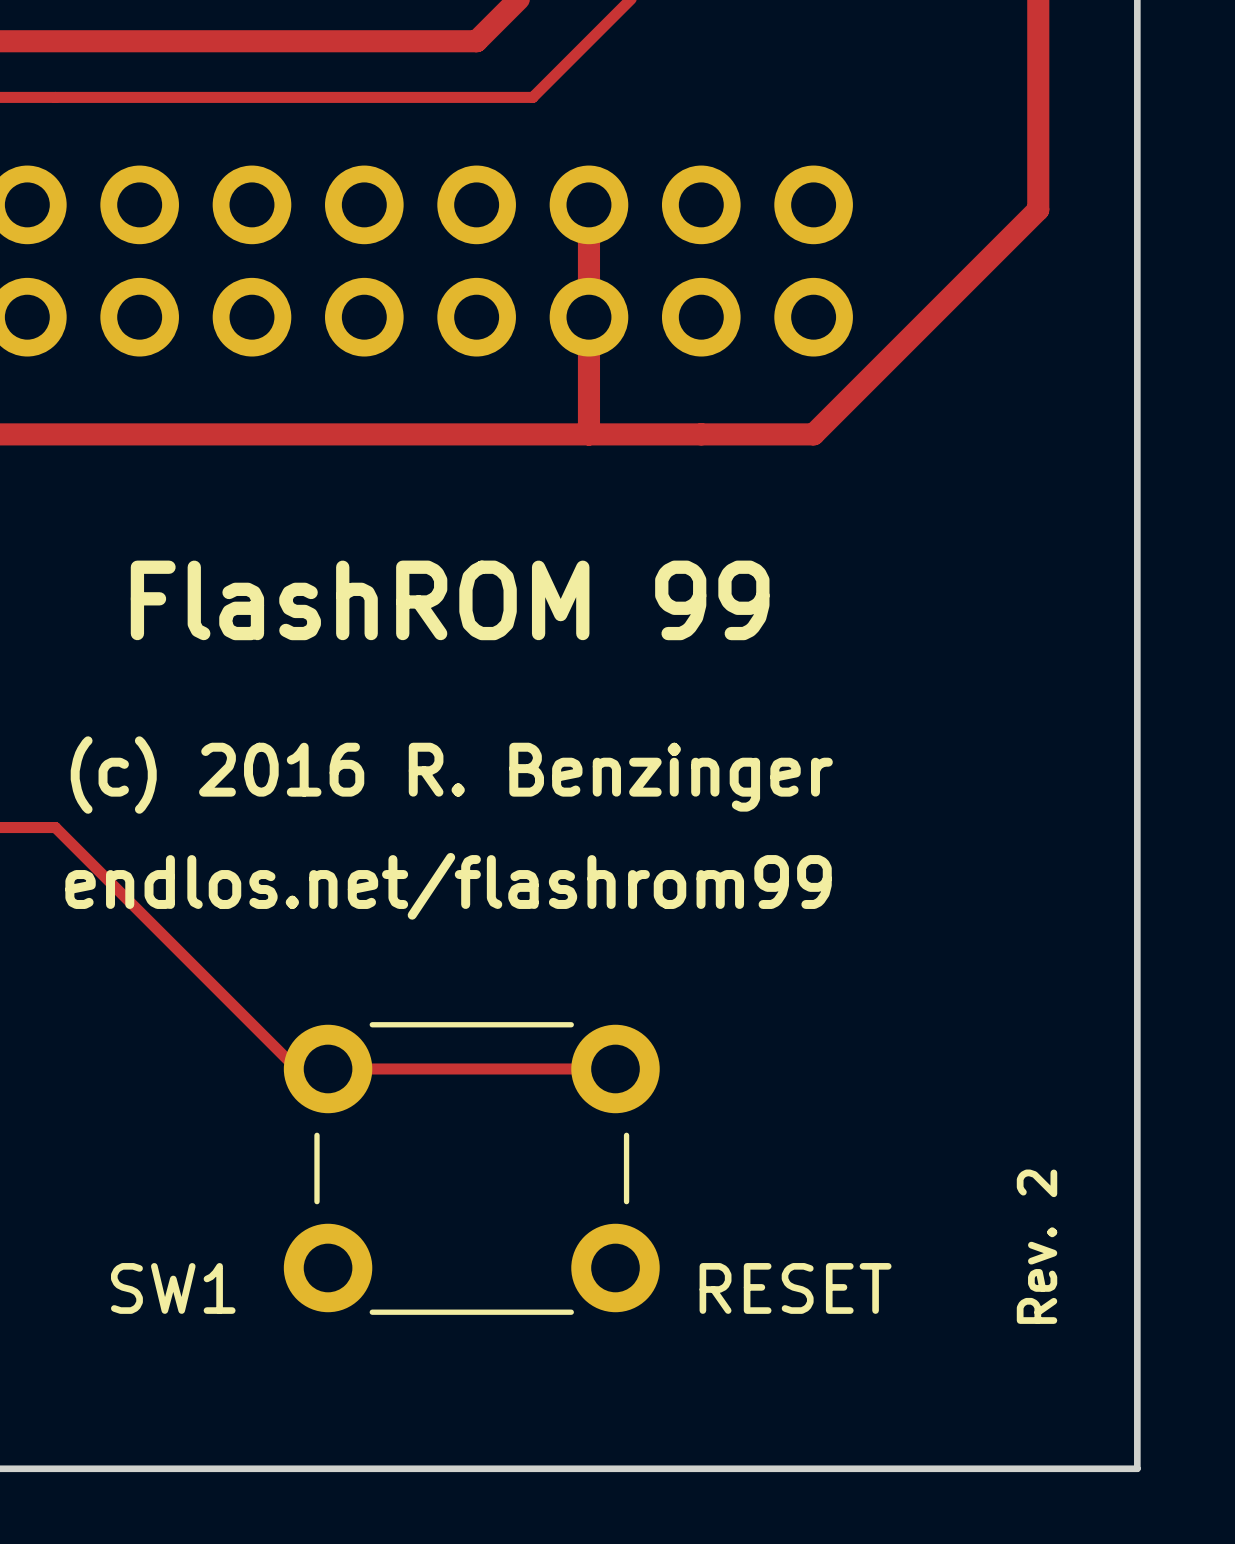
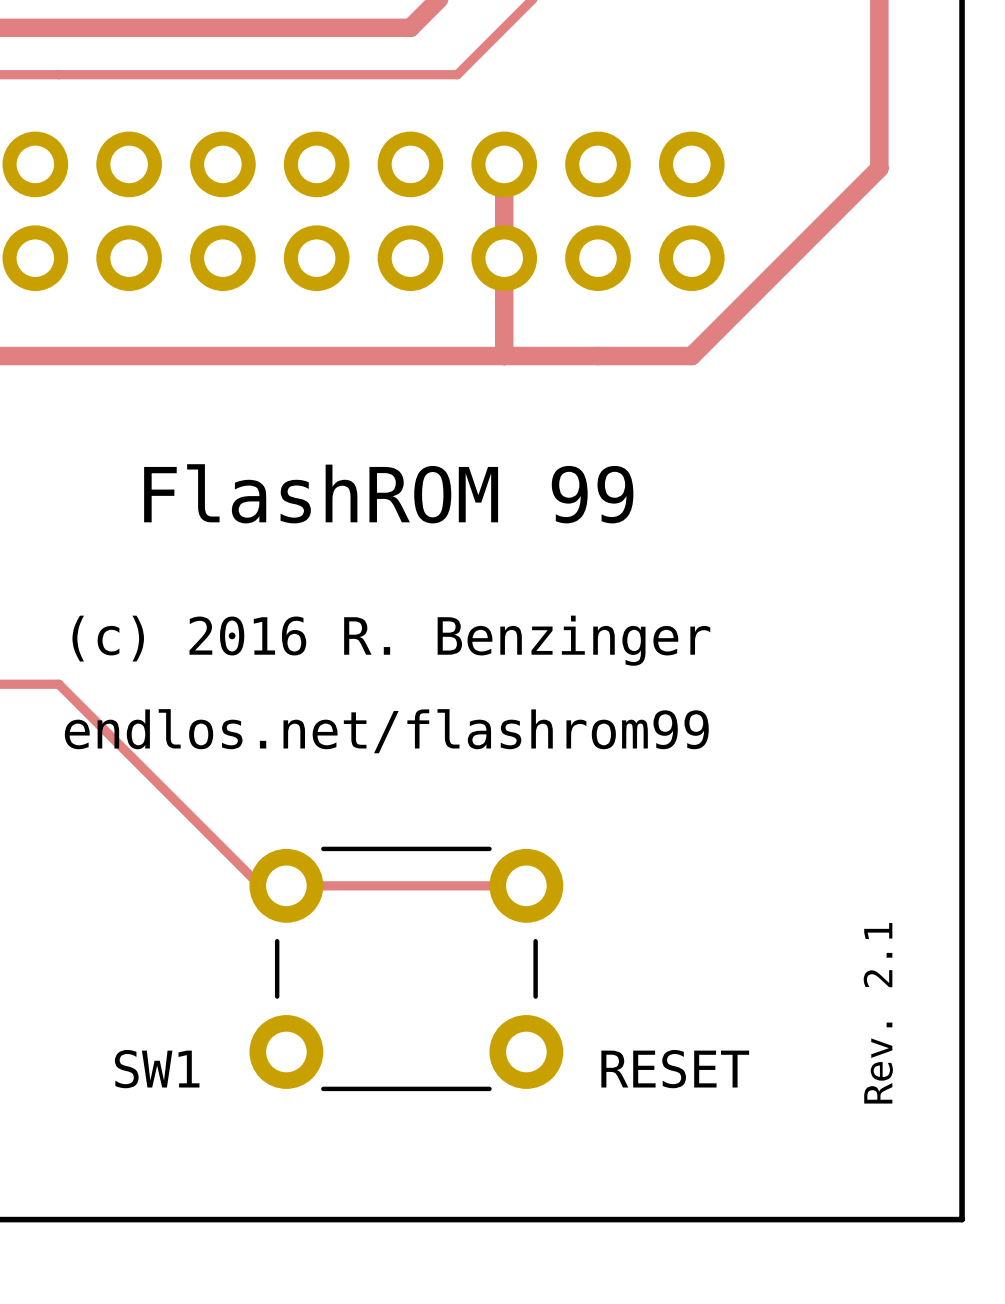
text: Rev. 2 (1037, 1246) -> Rev. 2.1 (878, 1013)

